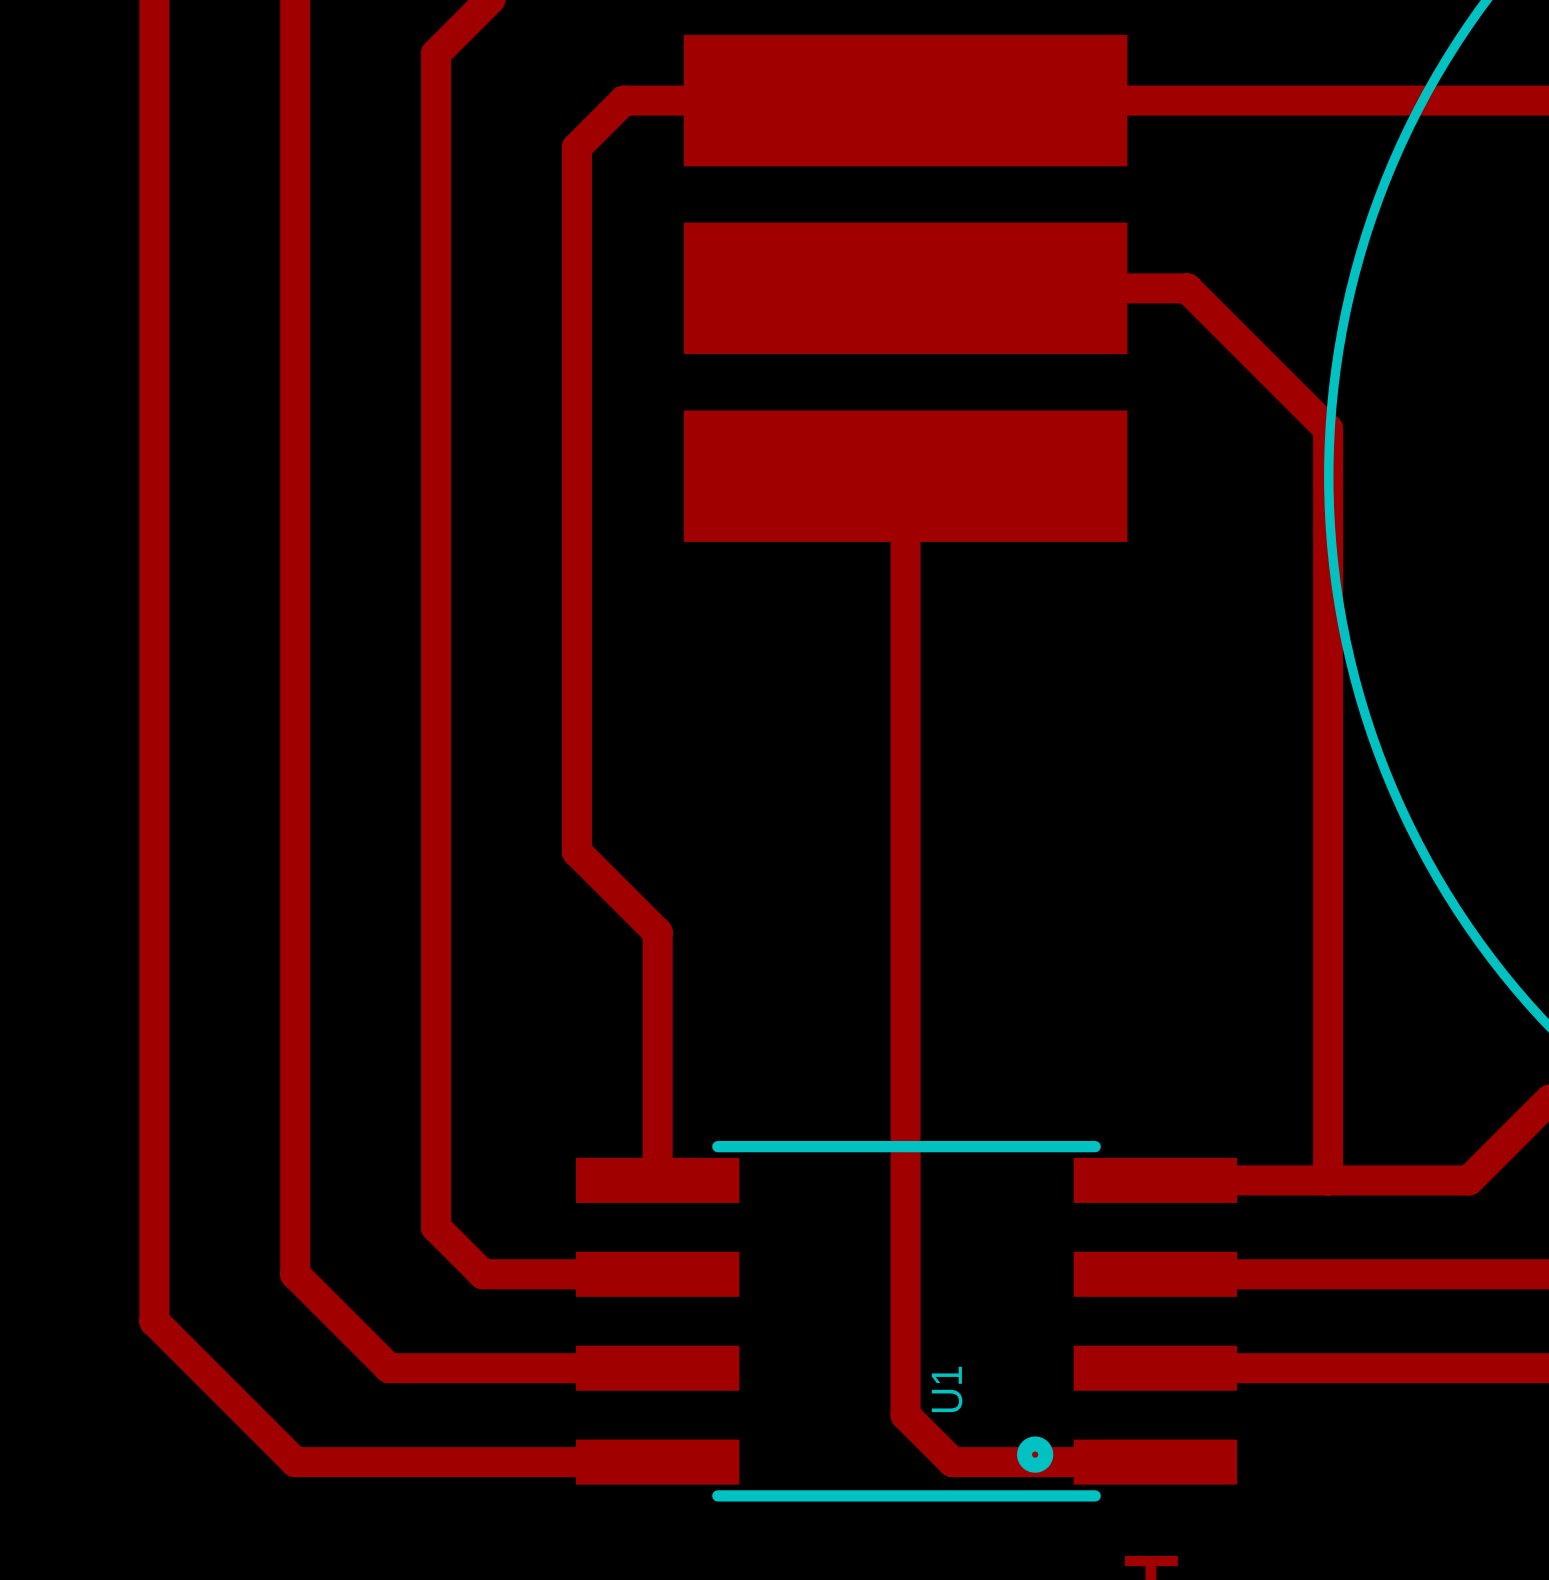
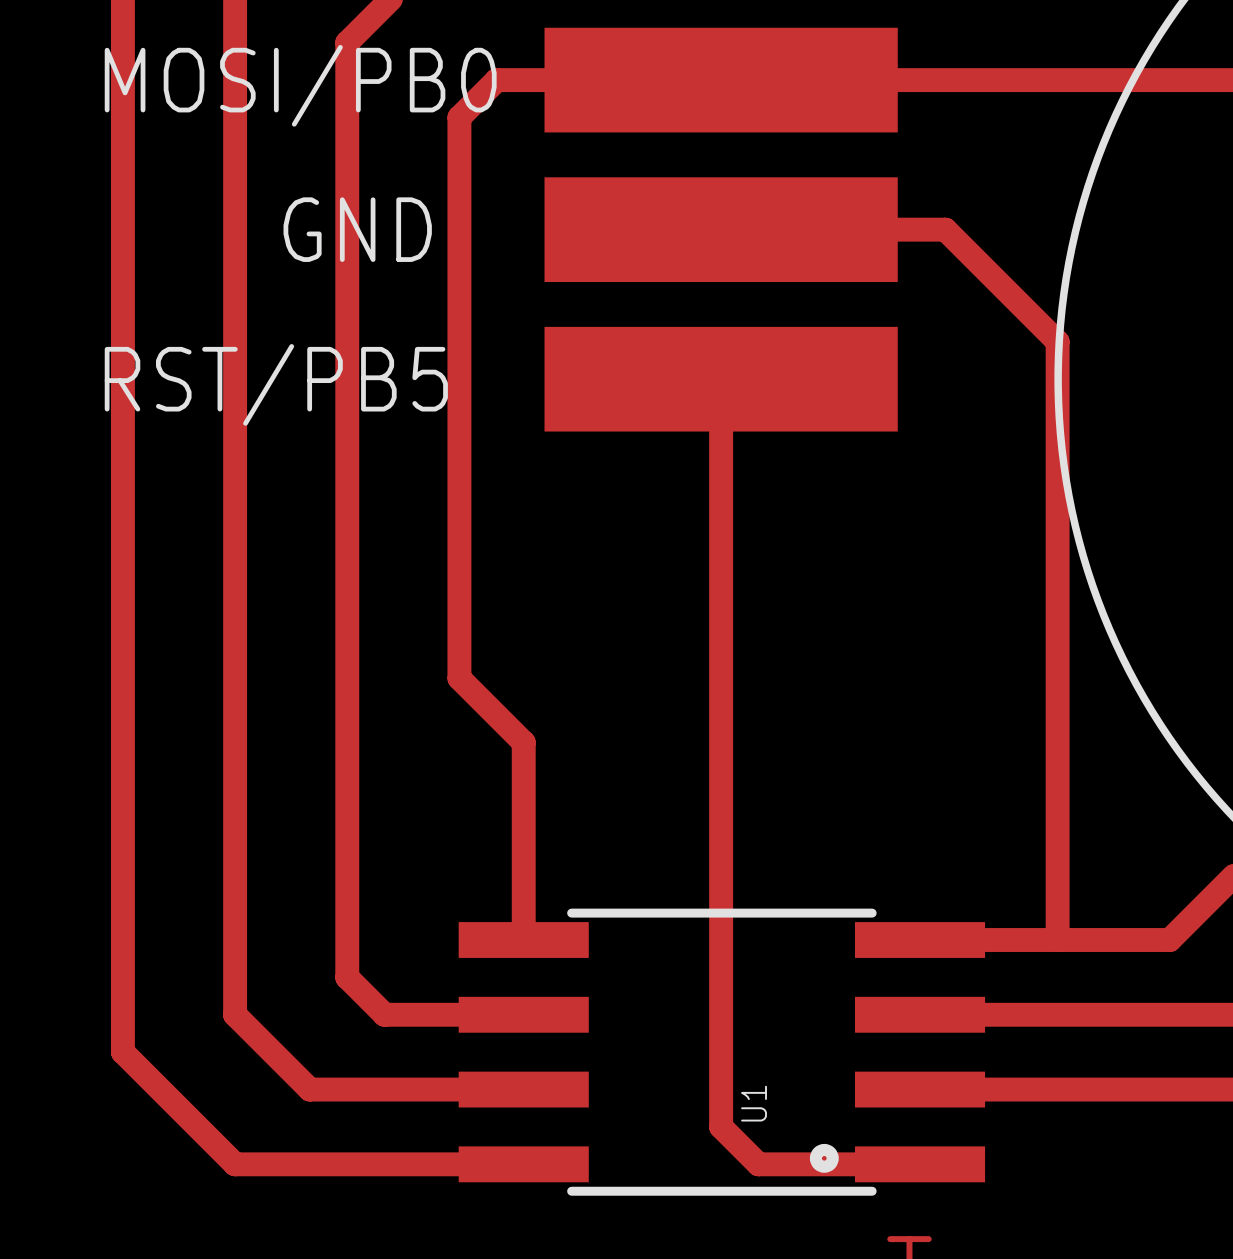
text: none -> MOSI/PB0 (300, 85)
text: none -> GND (357, 229)
text: none -> RST/PB5 (276, 384)

